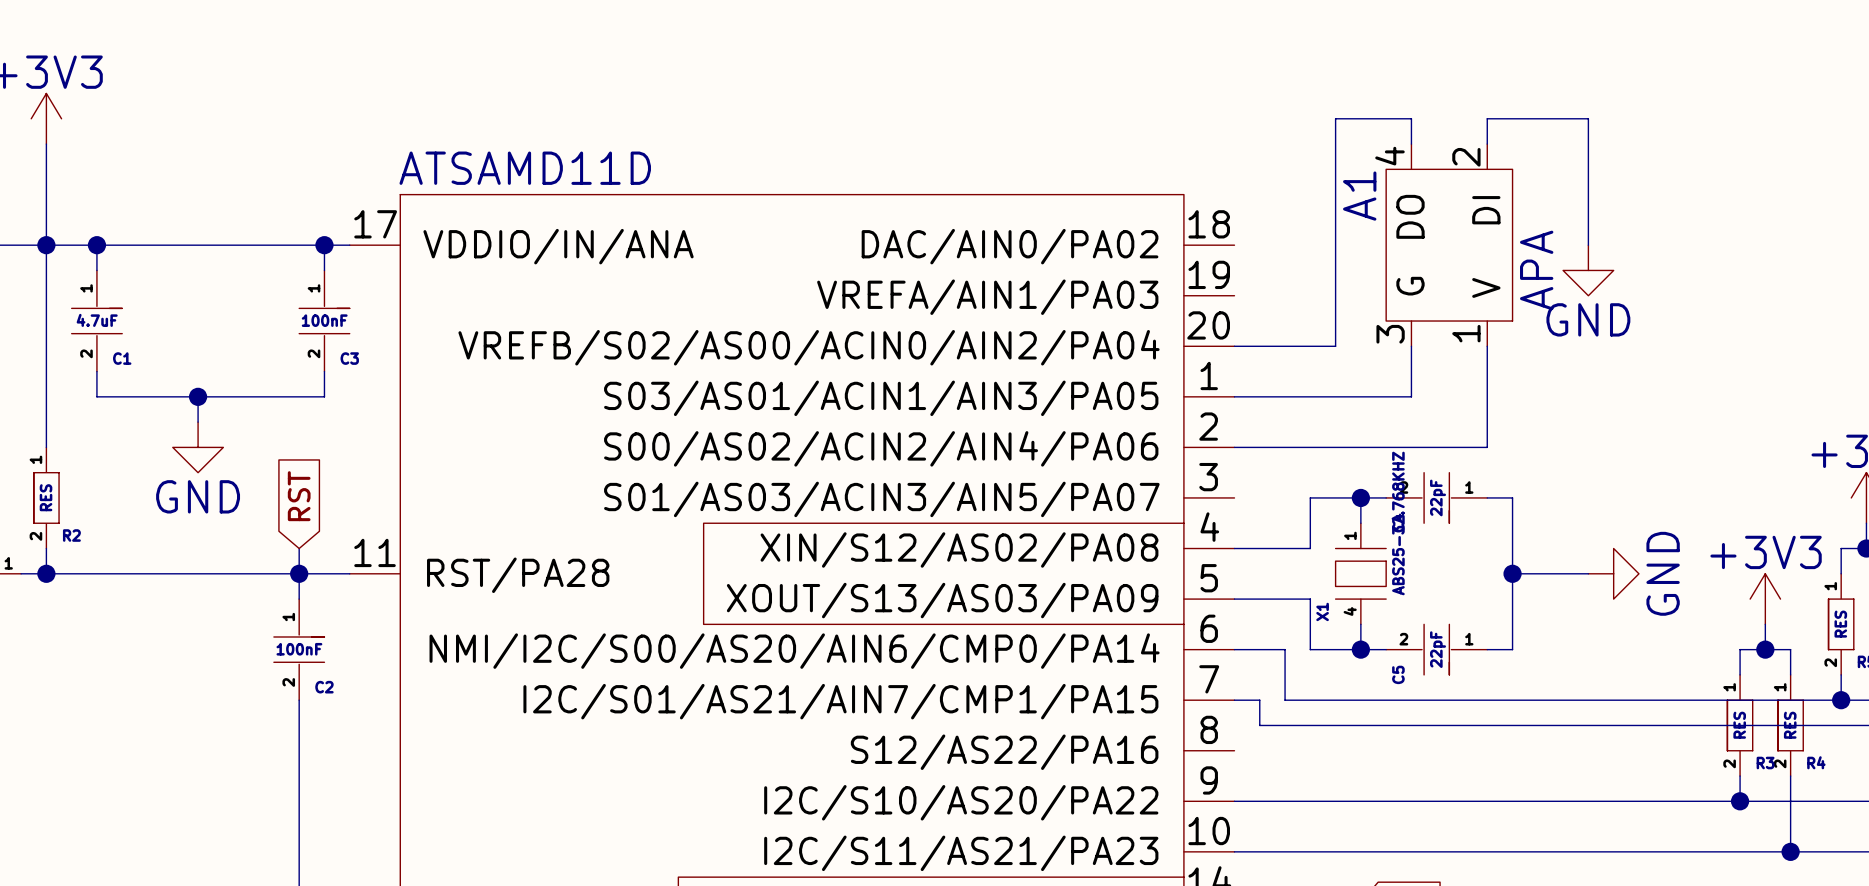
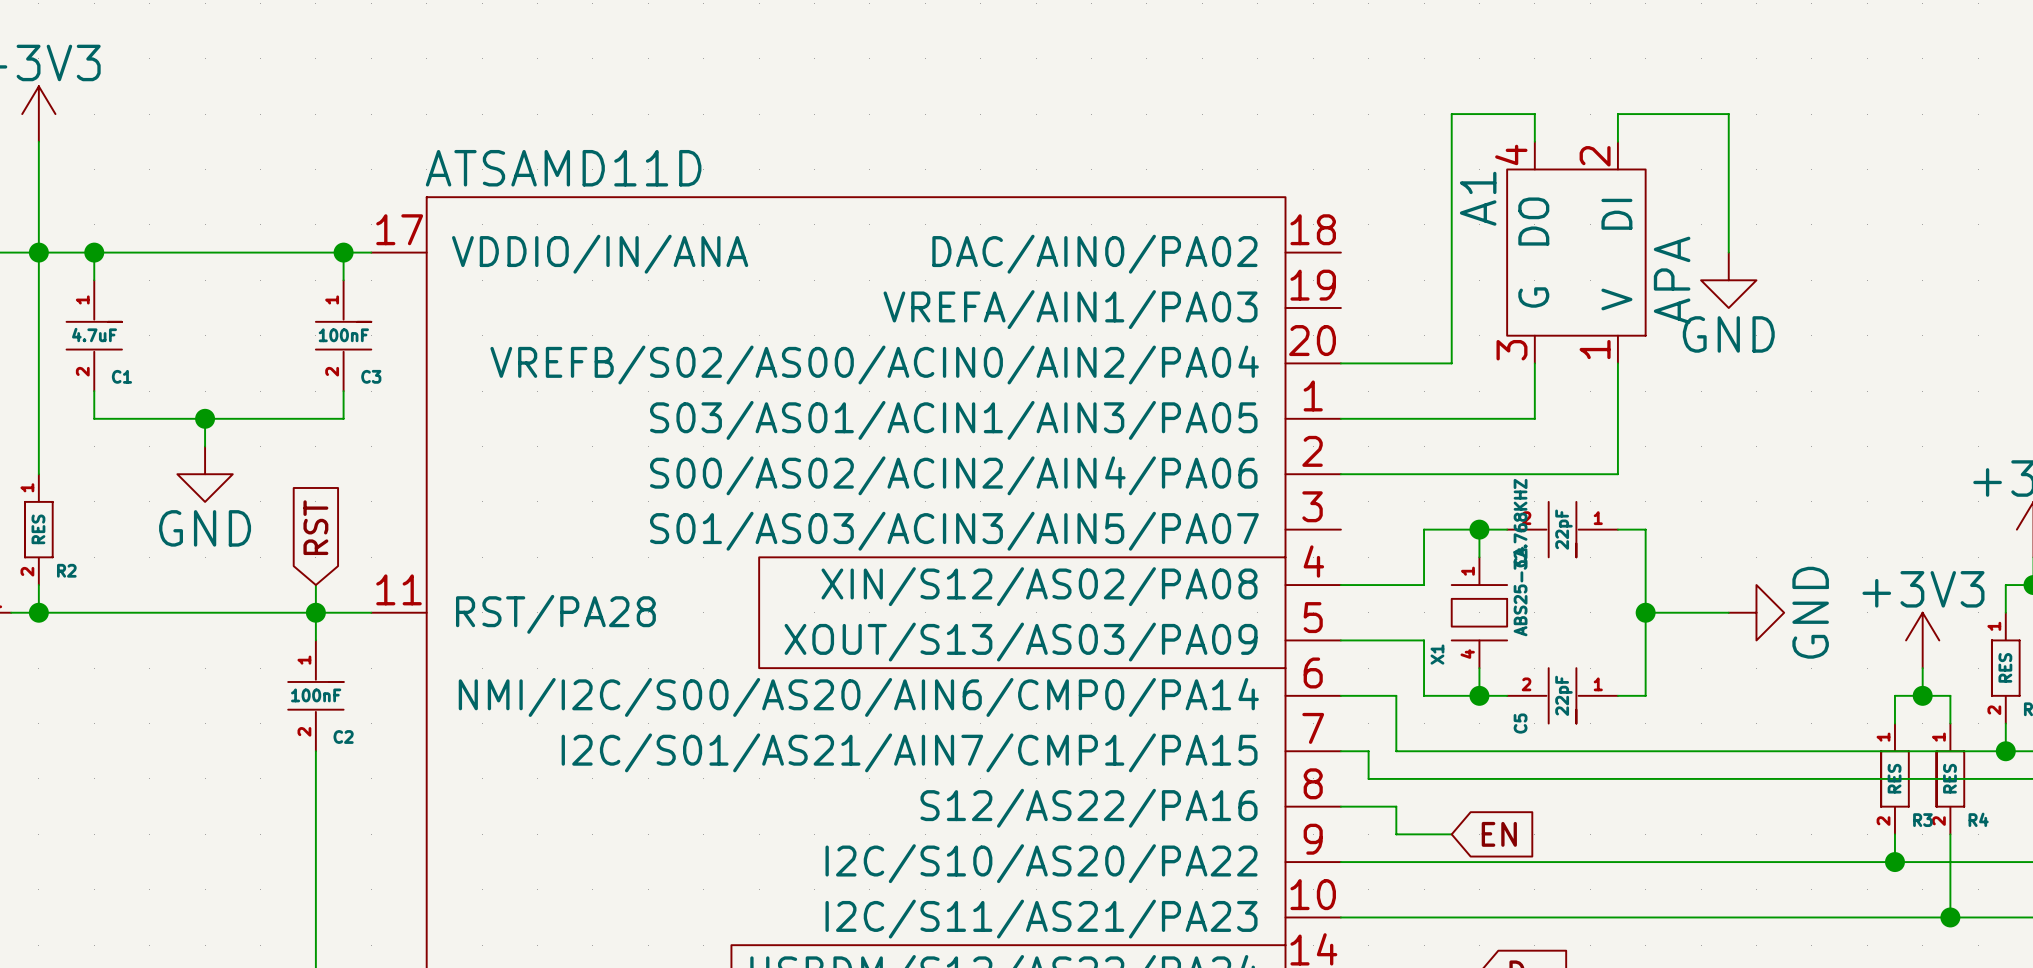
wire: none -> (1340, 806) (1396, 806) (1396, 834) (1451, 834)
global label: none -> EN (1499, 834)

